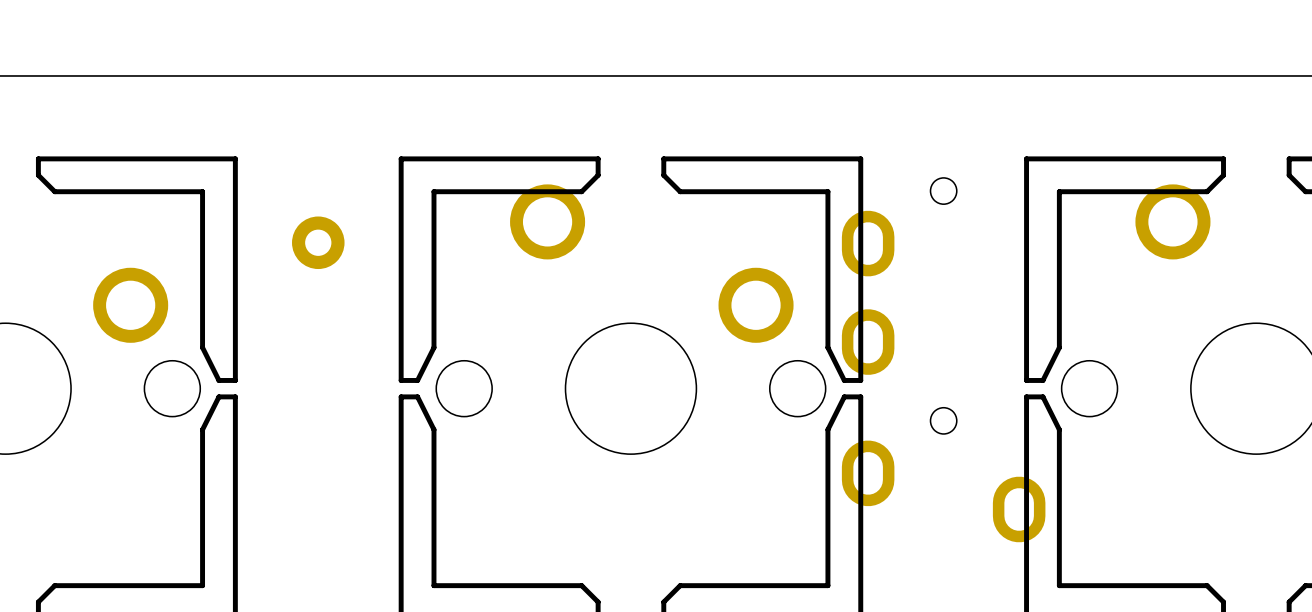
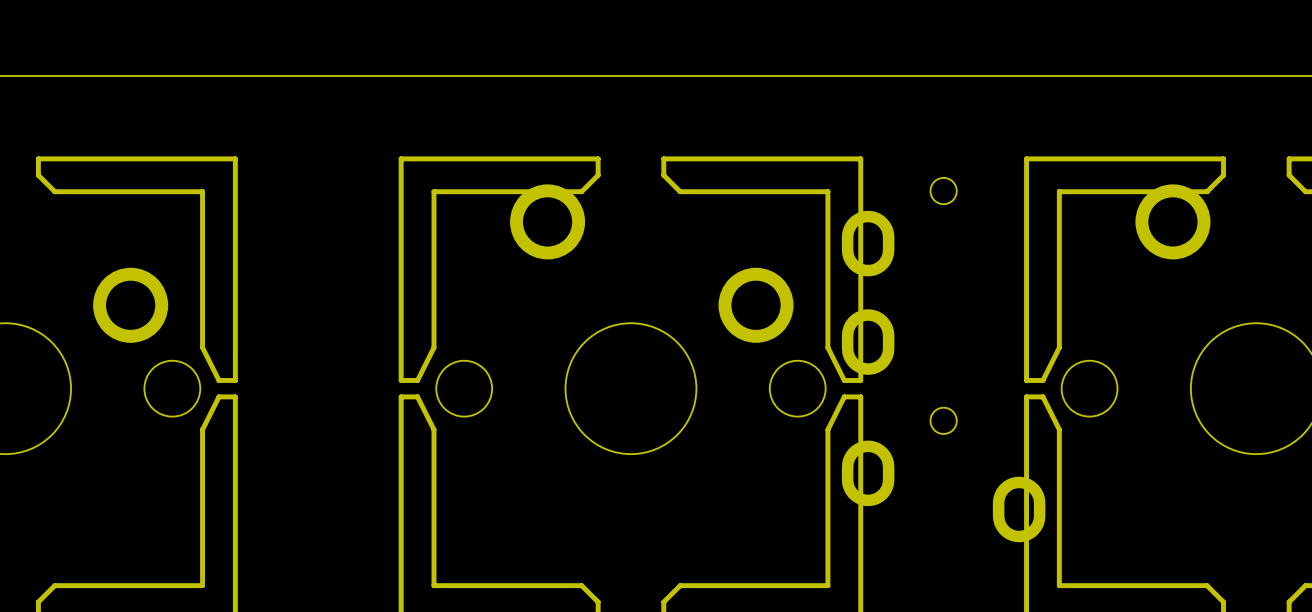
part: (318, 242) -> none

